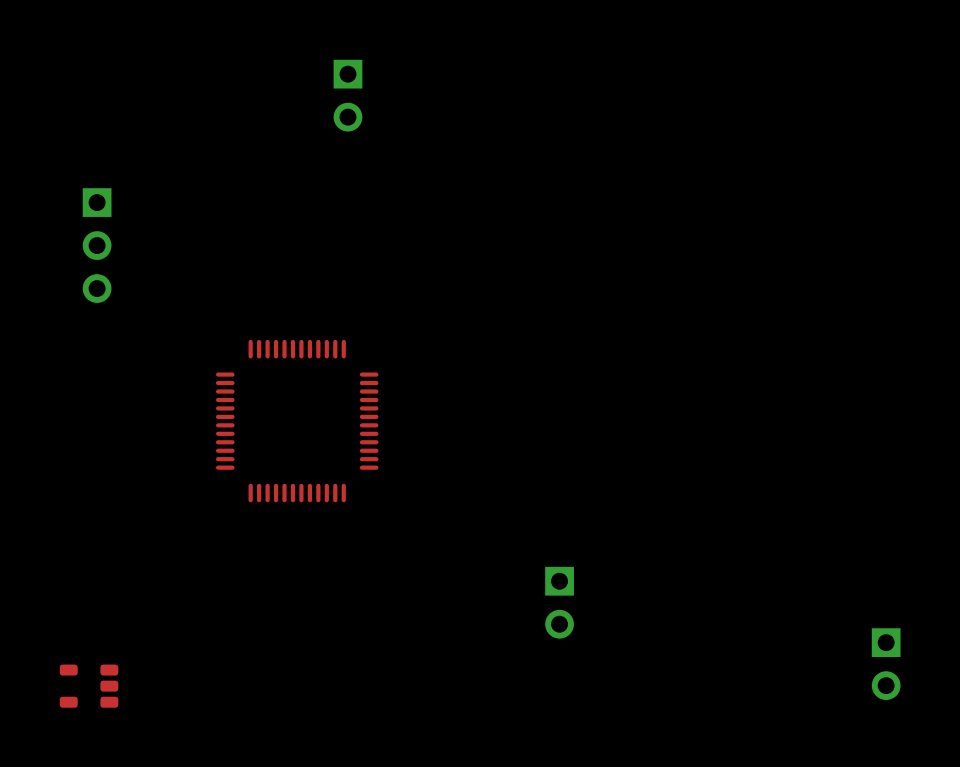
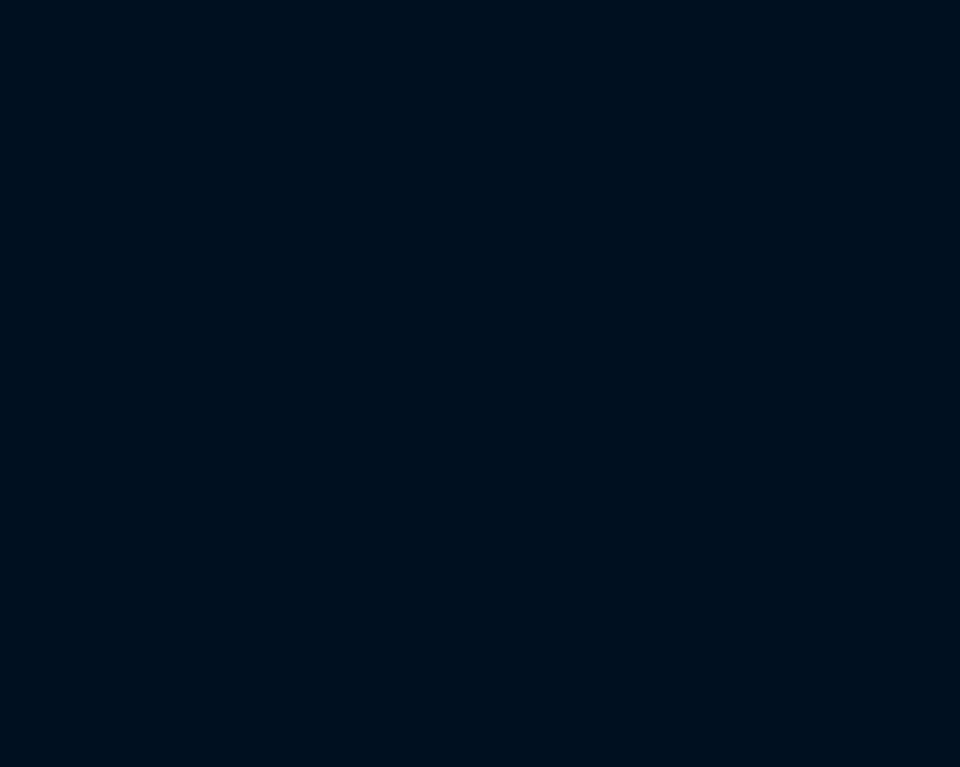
part: (347, 95) -> none
part: (97, 245) -> none
part: (297, 421) -> none
part: (559, 602) -> none
part: (886, 664) -> none
part: (89, 686) -> none

